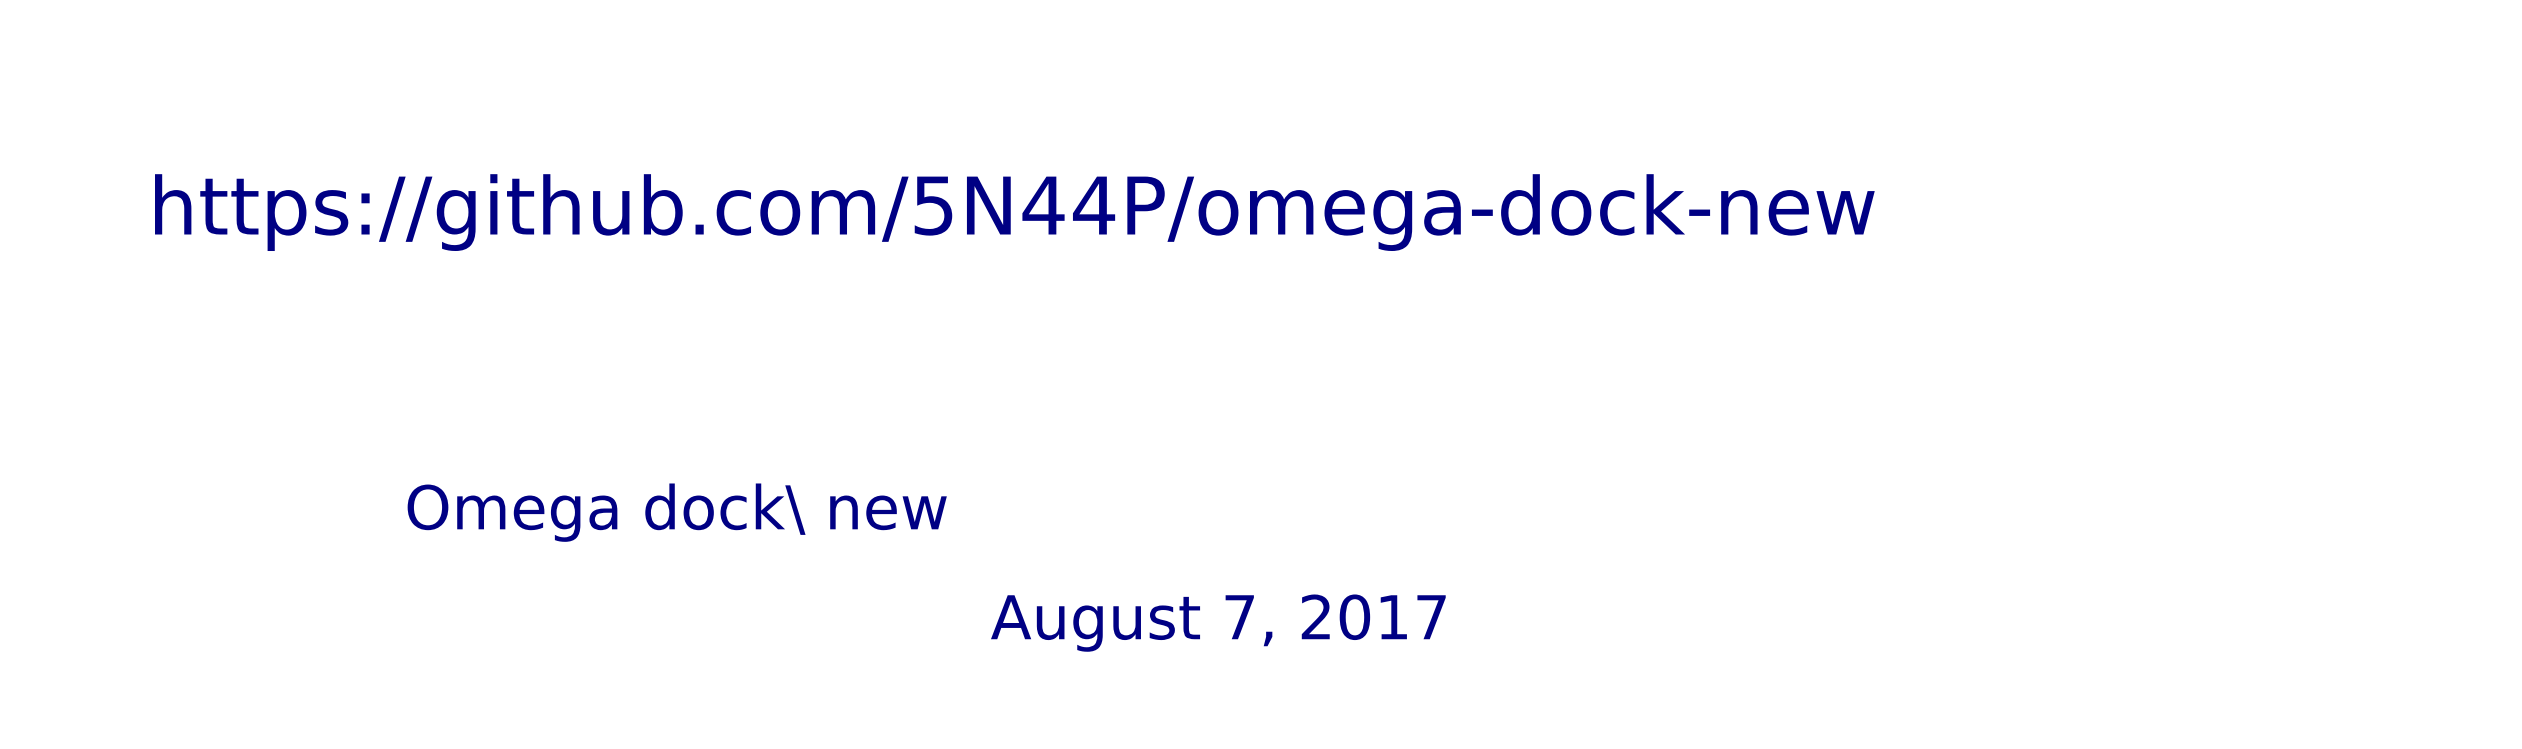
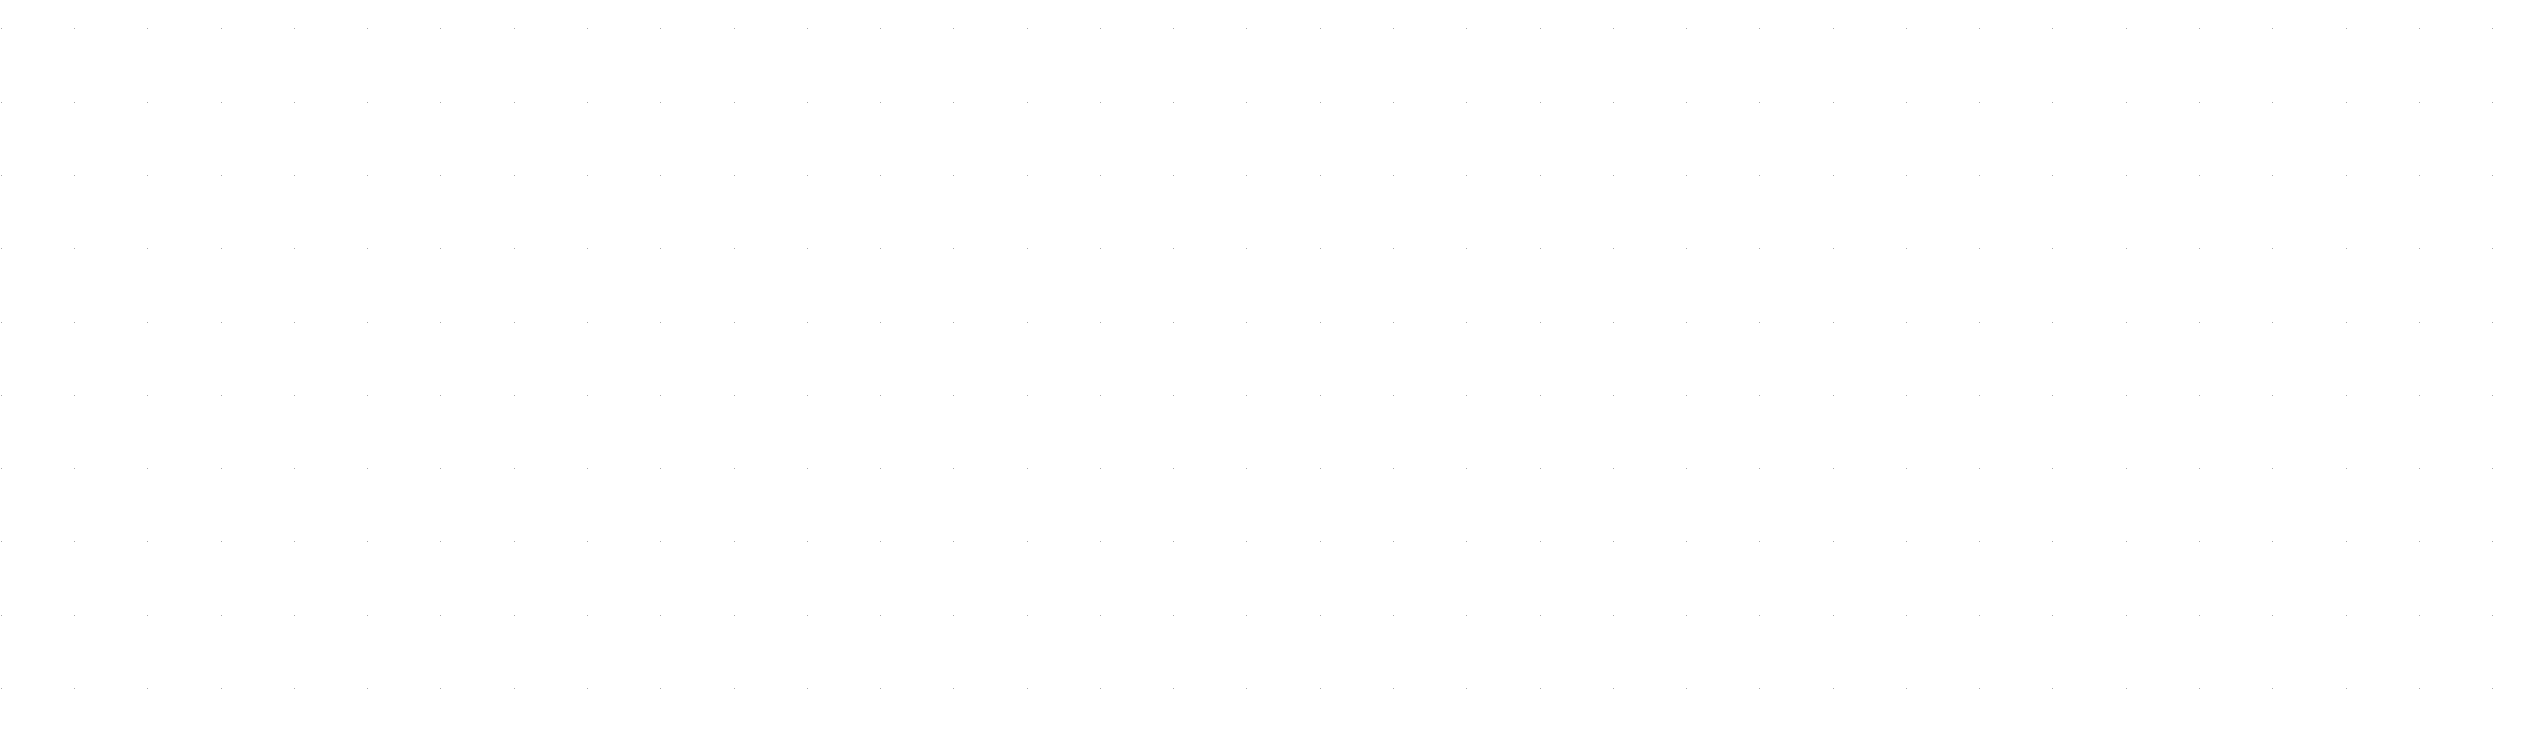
text: https://github.com/5N44P/omega-dock-new (1014, 212) -> none
text: Omega dock\ new (677, 512) -> none
text: August 7, 2017 (1218, 623) -> none

